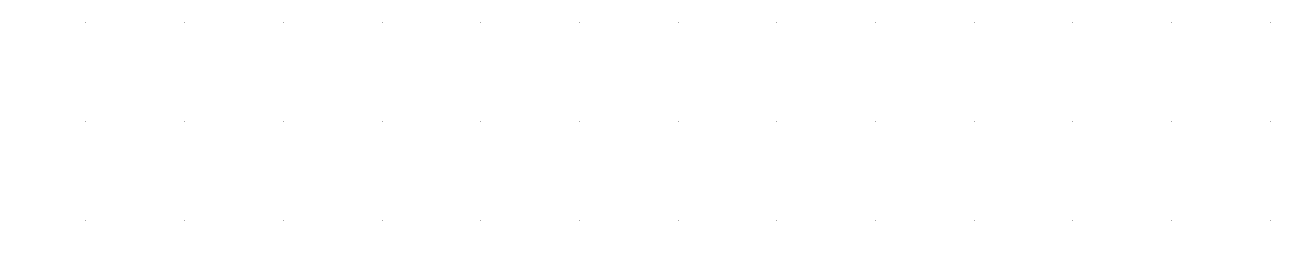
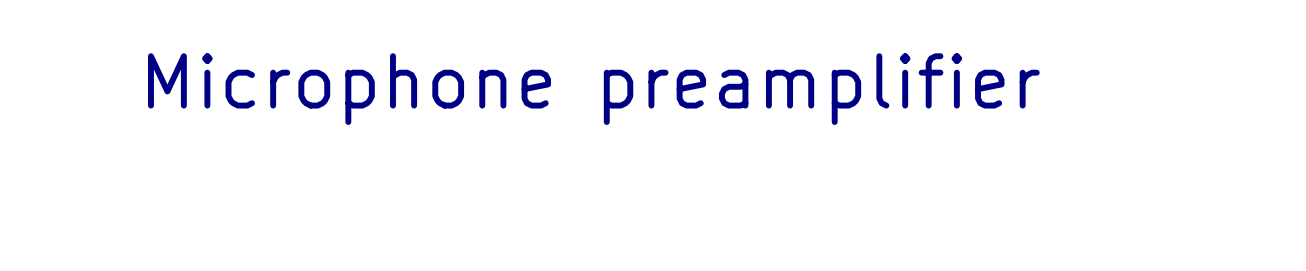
text: none -> Microphone preamplifier (593, 89)

